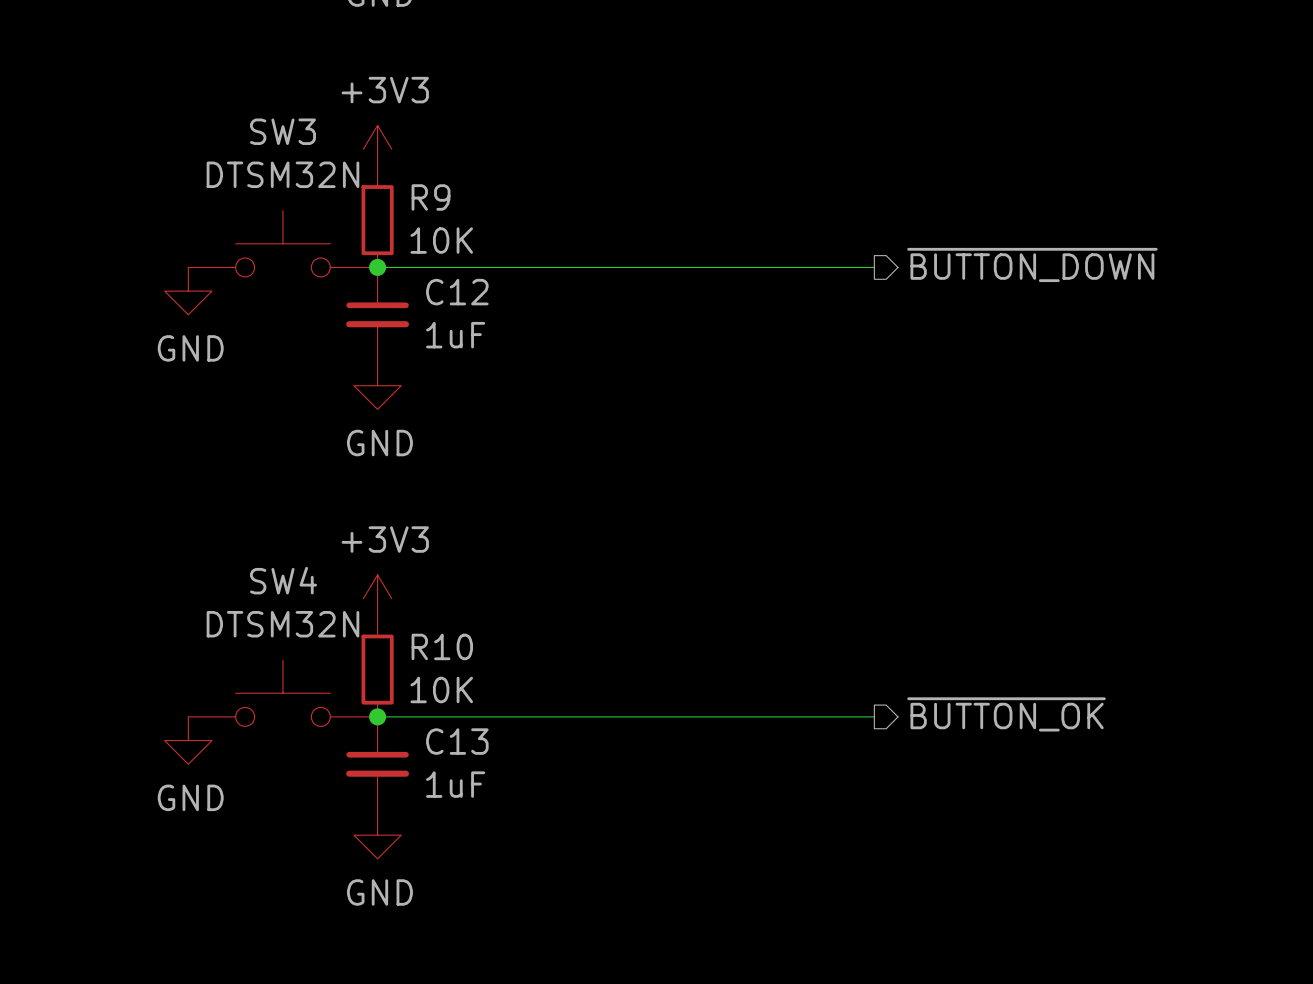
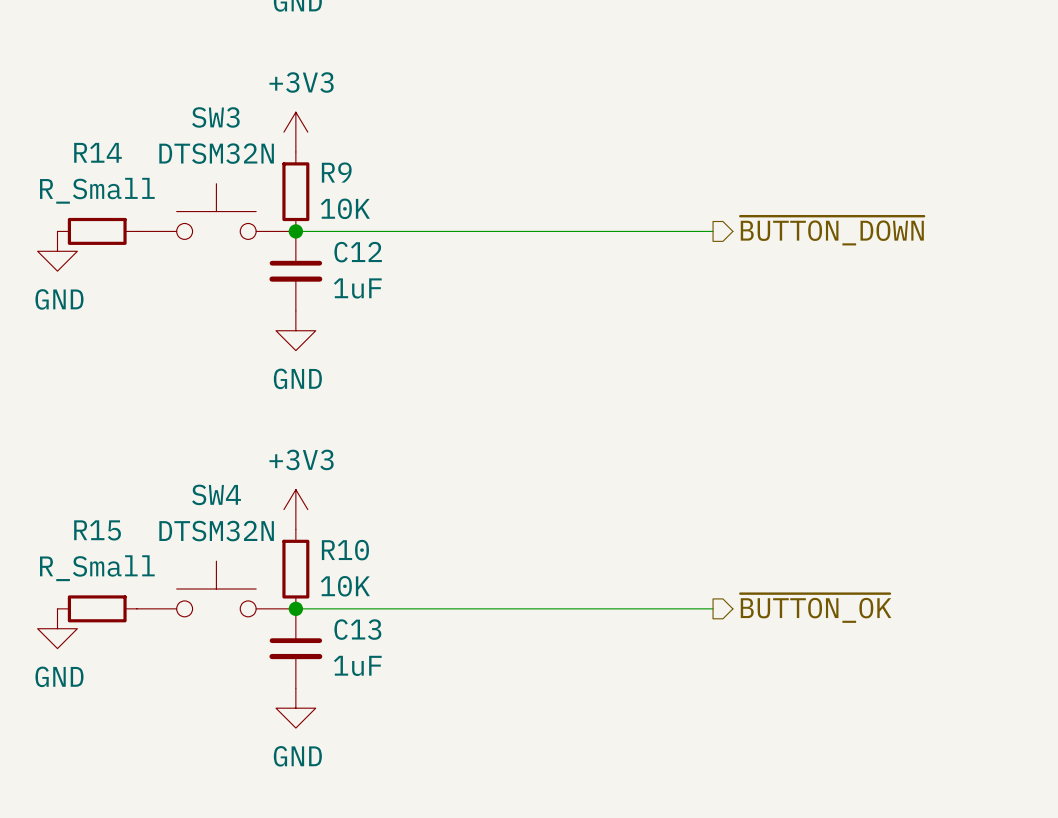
R14: none -> R_Small (97, 231)
power symbol position: GND (188, 291) -> GND (57, 251)
R15: none -> R_Small (97, 608)
power symbol position: GND (188, 740) -> GND (57, 628)

